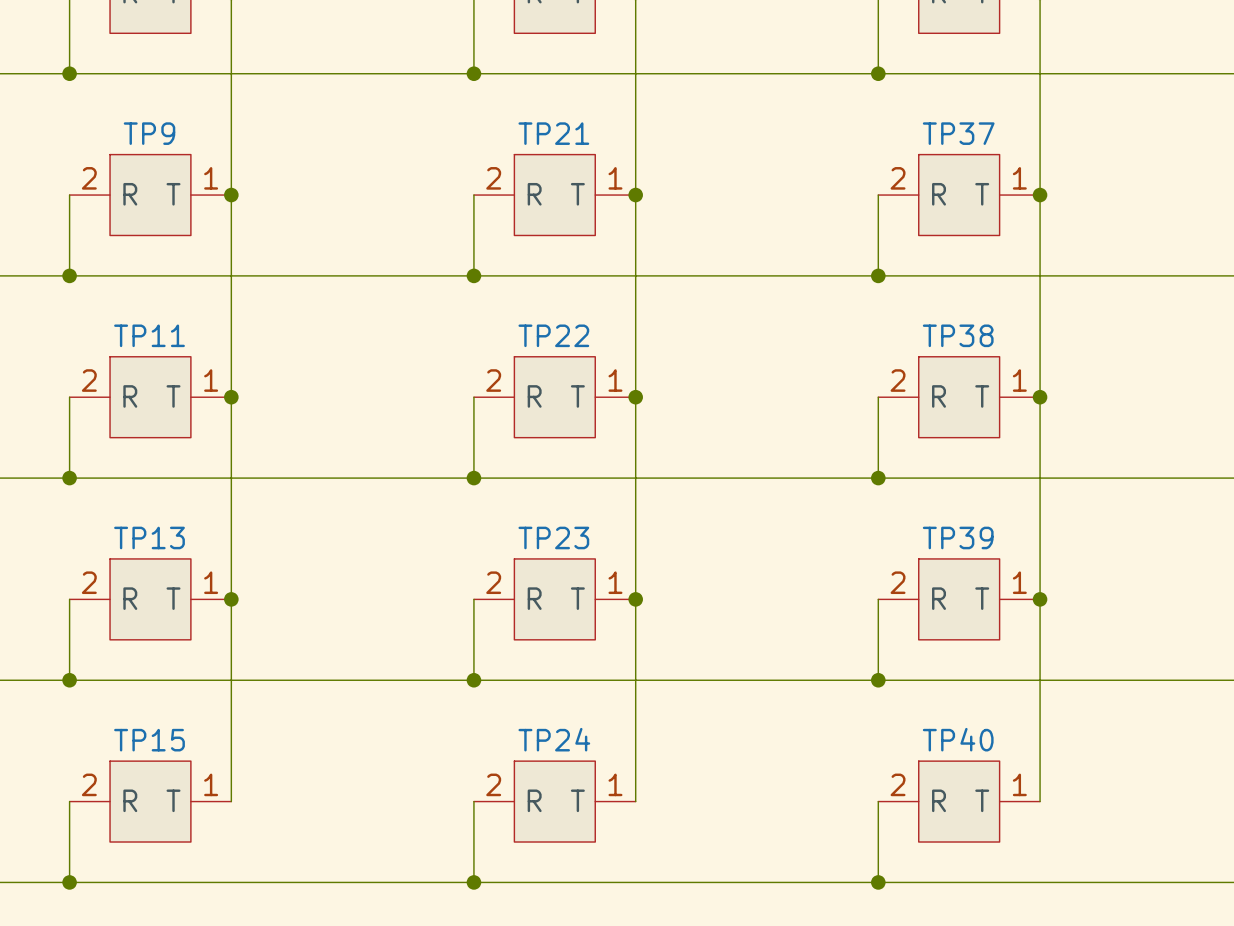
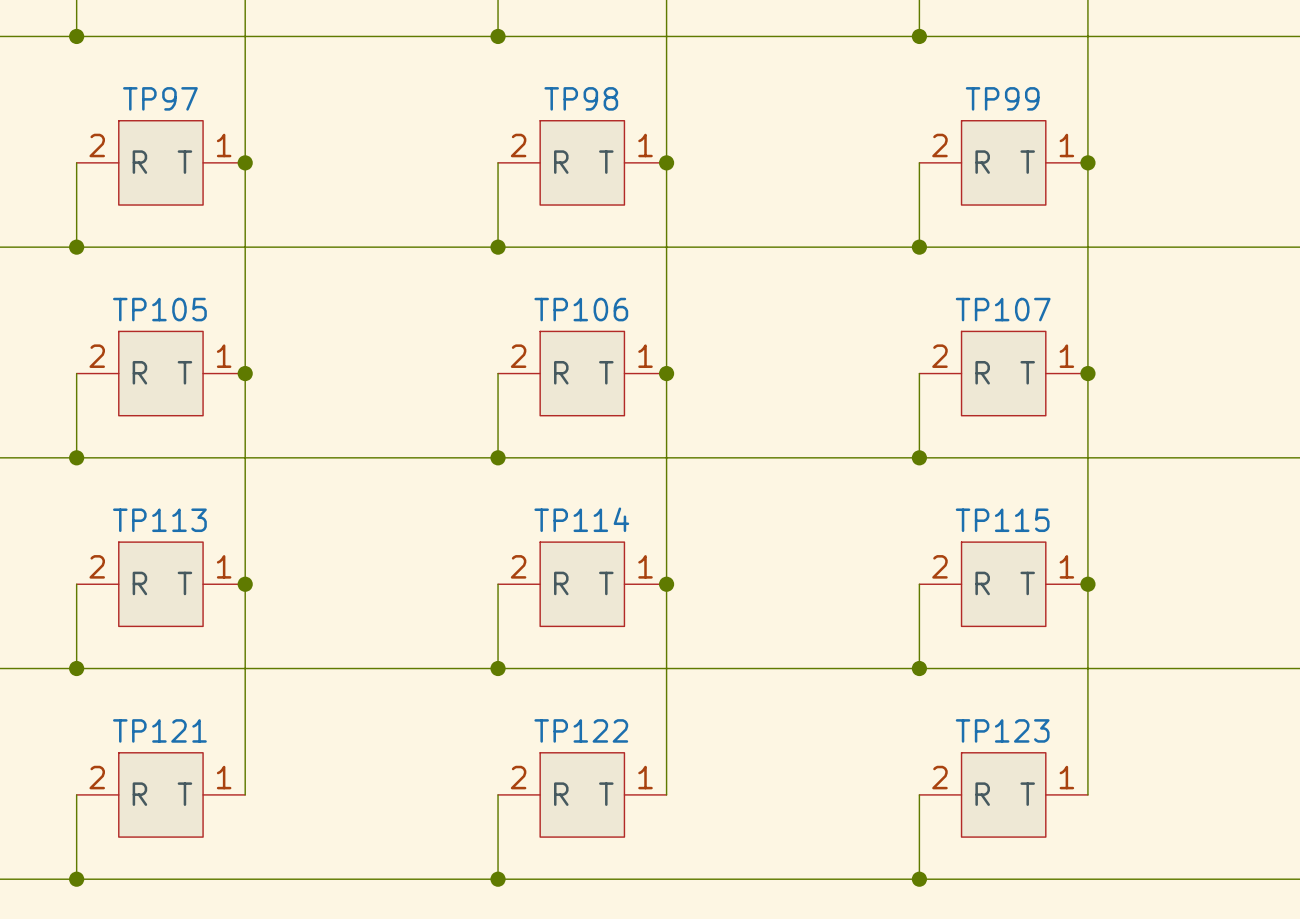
TP9 name: TP9 (149, 133) -> TP97 (160, 98)
TP21 name: TP21 (553, 133) -> TP98 (581, 98)
TP37 name: TP37 (958, 133) -> TP99 (1002, 98)
TP11 name: TP11 (149, 335) -> TP105 (159, 309)
TP22 name: TP22 (553, 335) -> TP106 (581, 309)
TP38 name: TP38 (958, 335) -> TP107 (1003, 309)
TP13 name: TP13 (149, 537) -> TP113 (159, 520)
TP23 name: TP23 (553, 537) -> TP114 (581, 519)
TP39 name: TP39 (958, 537) -> TP115 (1002, 520)
TP24 name: TP24 (554, 739) -> TP122 (581, 730)
TP40 name: TP40 (958, 739) -> TP123 (1002, 730)
TP15 name: TP15 (149, 740) -> TP121 (159, 730)

